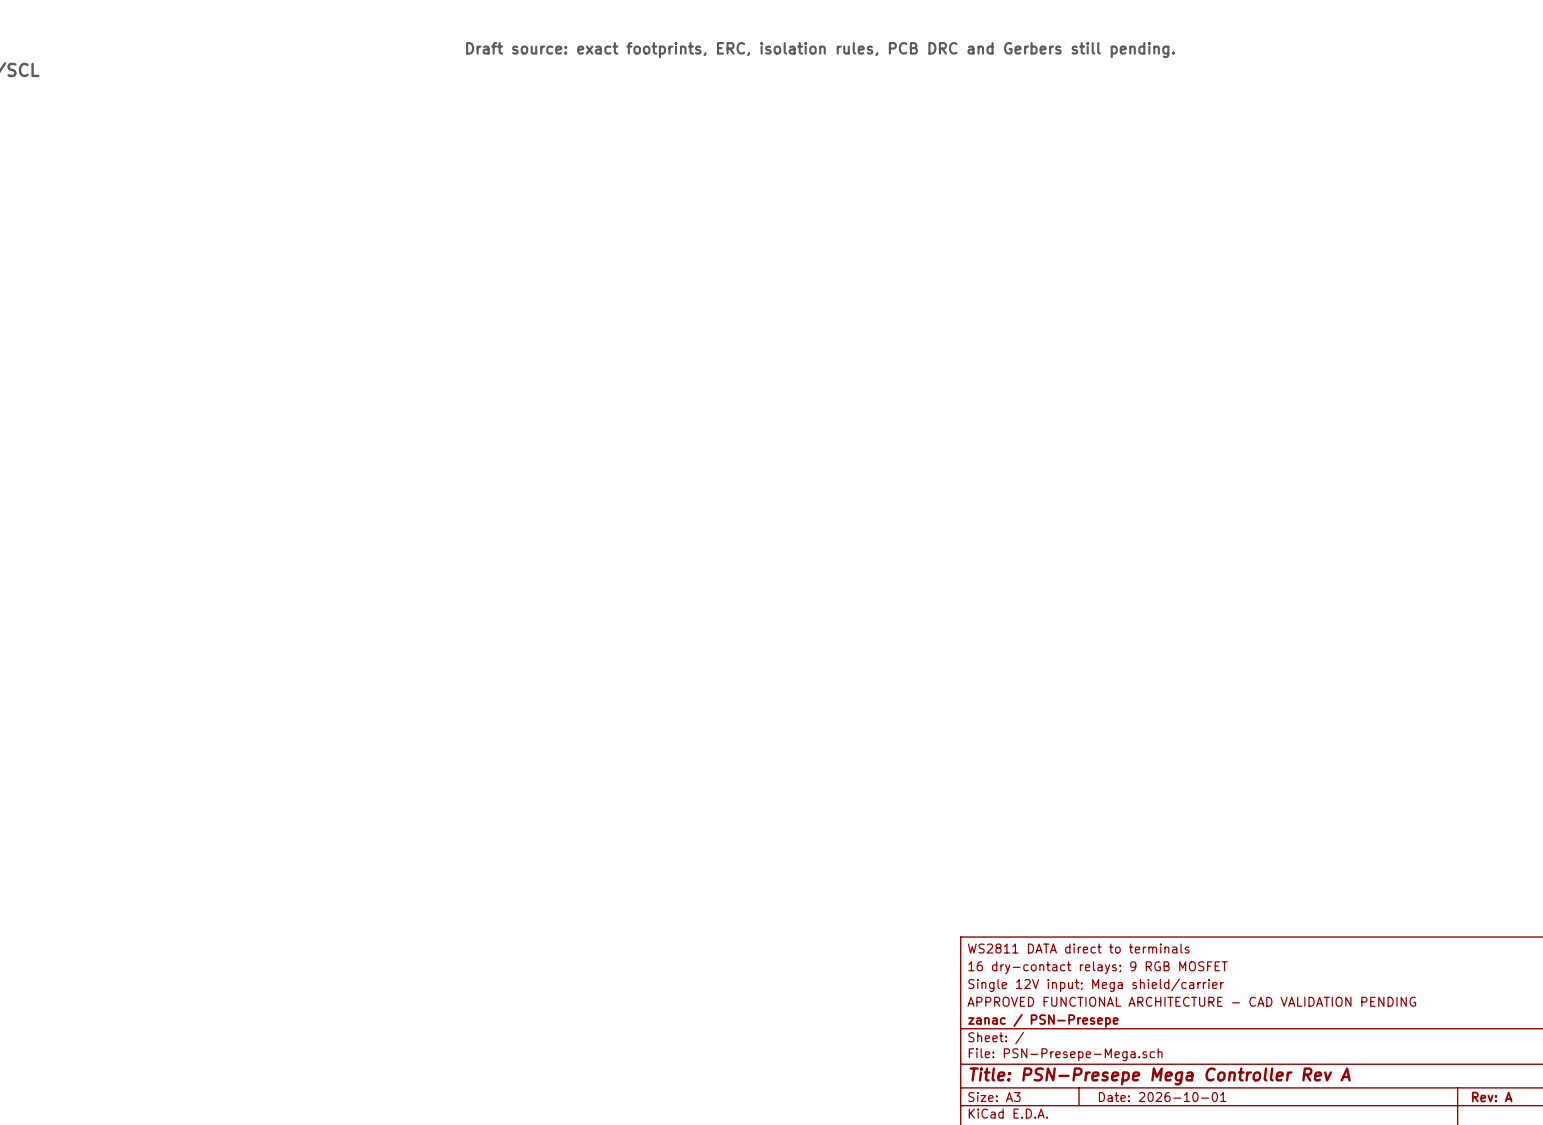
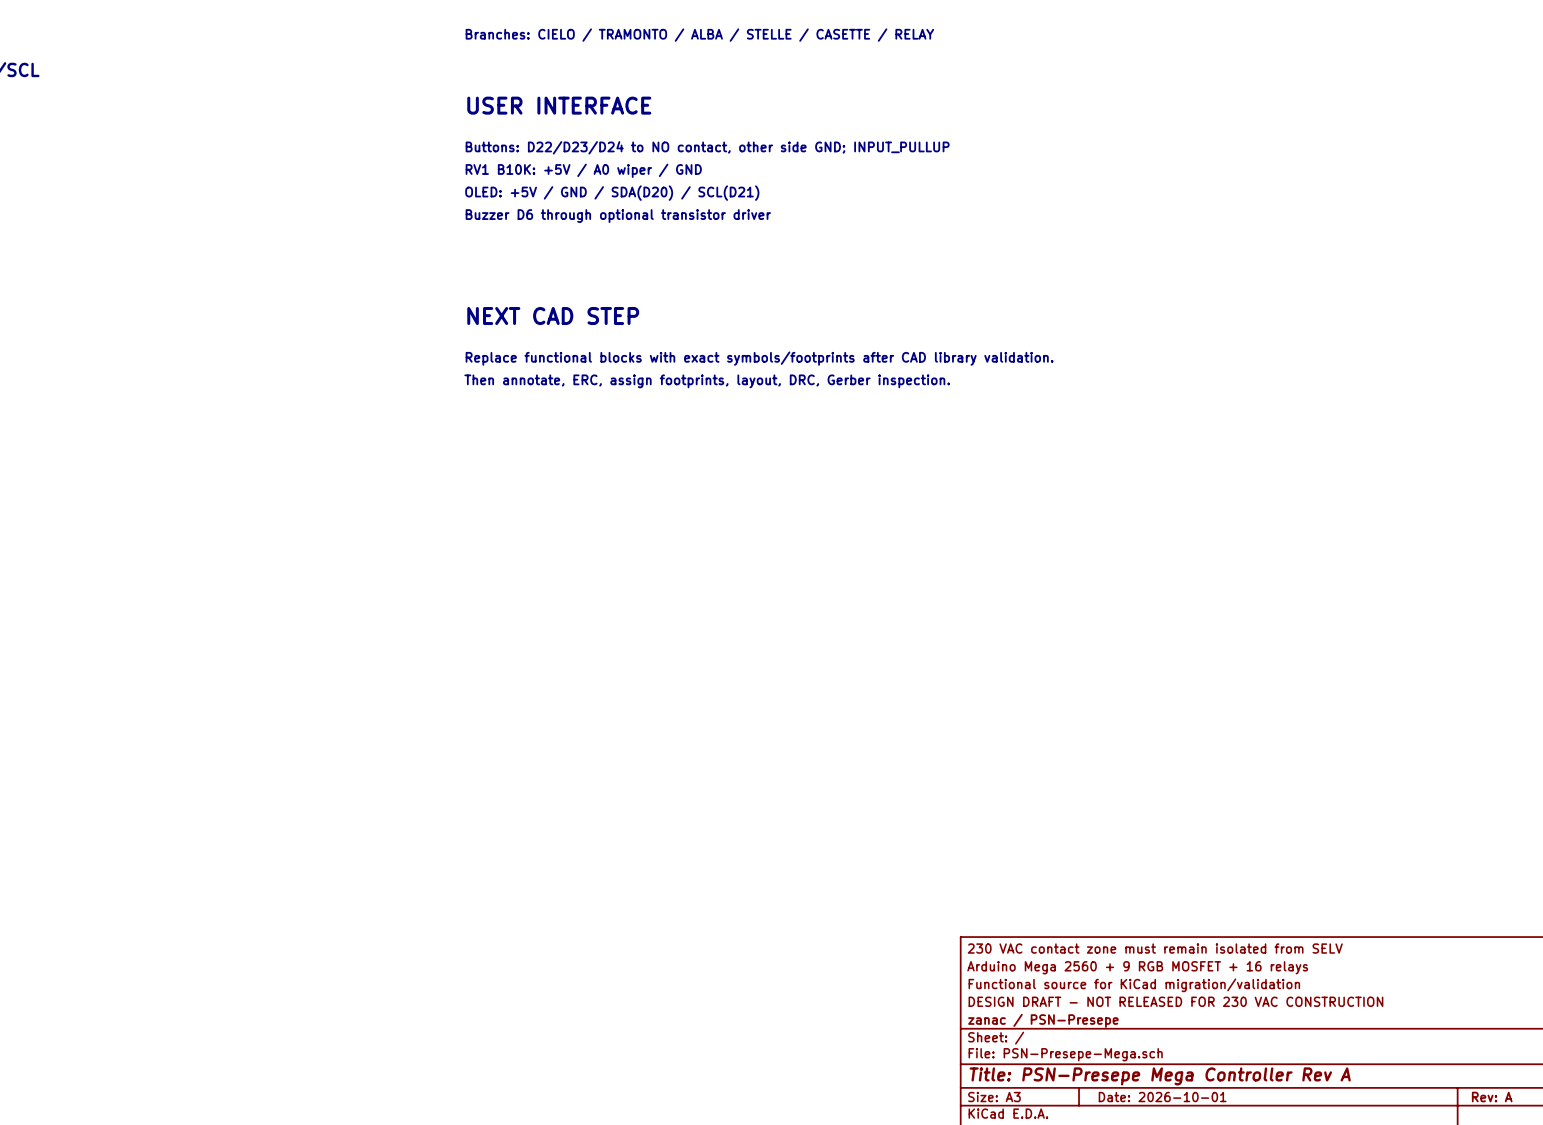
text: none -> Branches: CIELO / TRAMONTO / ALBA / STELLE / CASETTE / RELAY (699, 35)
text: Draft source: exact footprints, ERC, isolation rules, PCB DRC and Gerbers still pending. (820, 50) -> none
text: none -> USER INTERFACE (559, 105)
text: none -> Buttons: D22/D23/D24 to NO contact, other side GND; INPUT_PULLUP (707, 147)
text: none -> RV1 B10K: +5V / A0 wiper / GND (583, 170)
text: none -> OLED: +5V / GND / SDA(D20) / SCL(D21) (612, 193)
text: none -> Buzzer D6 through optional transistor driver (618, 216)
text: none -> NEXT CAD STEP (553, 316)
text: none -> Replace functional blocks with exact symbols/footprints after CAD library validation. (759, 358)
text: none -> Then annotate, ERC, assign footprints, layout, DRC, Gerber inspection. (707, 381)
title block: WS2811 DATA direct to terminals (1078, 948) -> 230 VAC contact zone must remain isolated from SELV (1155, 948)
title block: 16 dry-contact relays; 9 RGB MOSFET (1097, 967) -> Arduino Mega 2560 + 9 RGB MOSFET + 16 relays (1137, 967)
title block: Single 12V input; Mega shield/carrier (1096, 985) -> Functional source for KiCad migration/validation (1134, 985)
title block: APPROVED FUNCTIONAL ARCHITECTURE - CAD VALIDATION PENDING (1191, 1001) -> DESIGN DRAFT - NOT RELEASED FOR 230 VAC CONSTRUCTION (1175, 1001)

